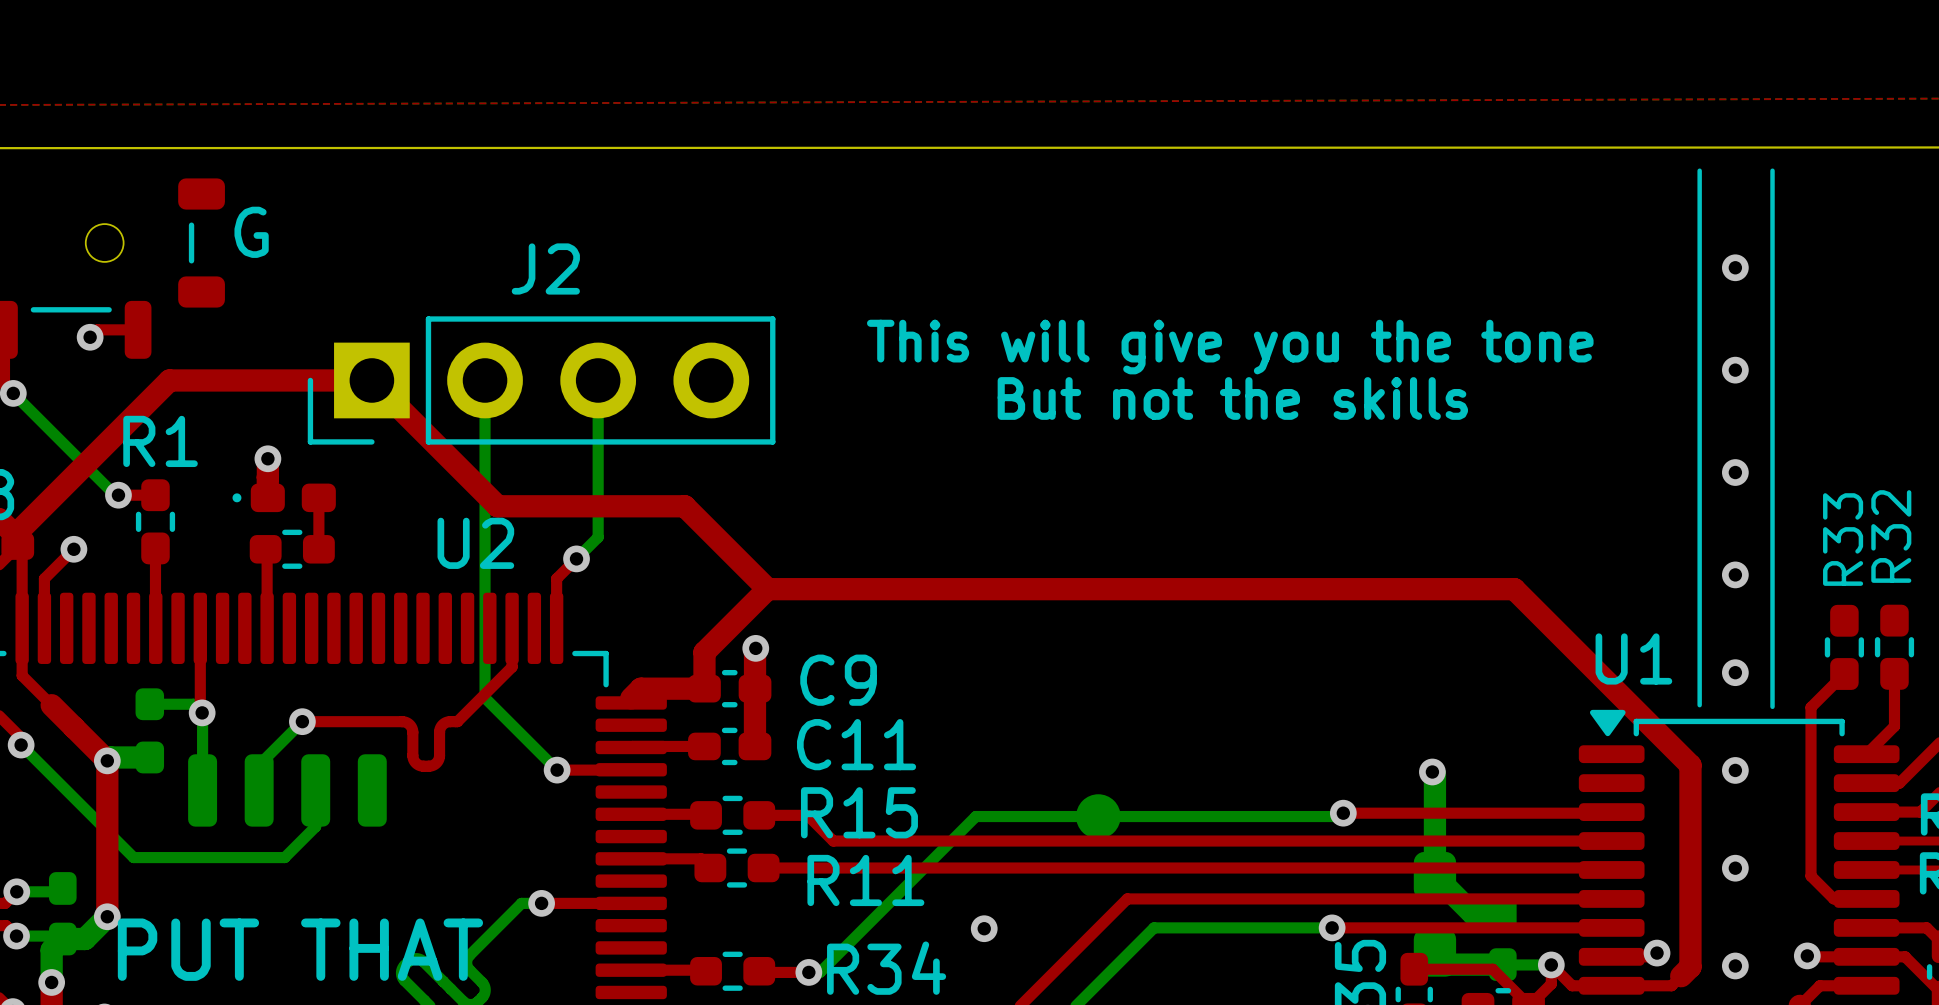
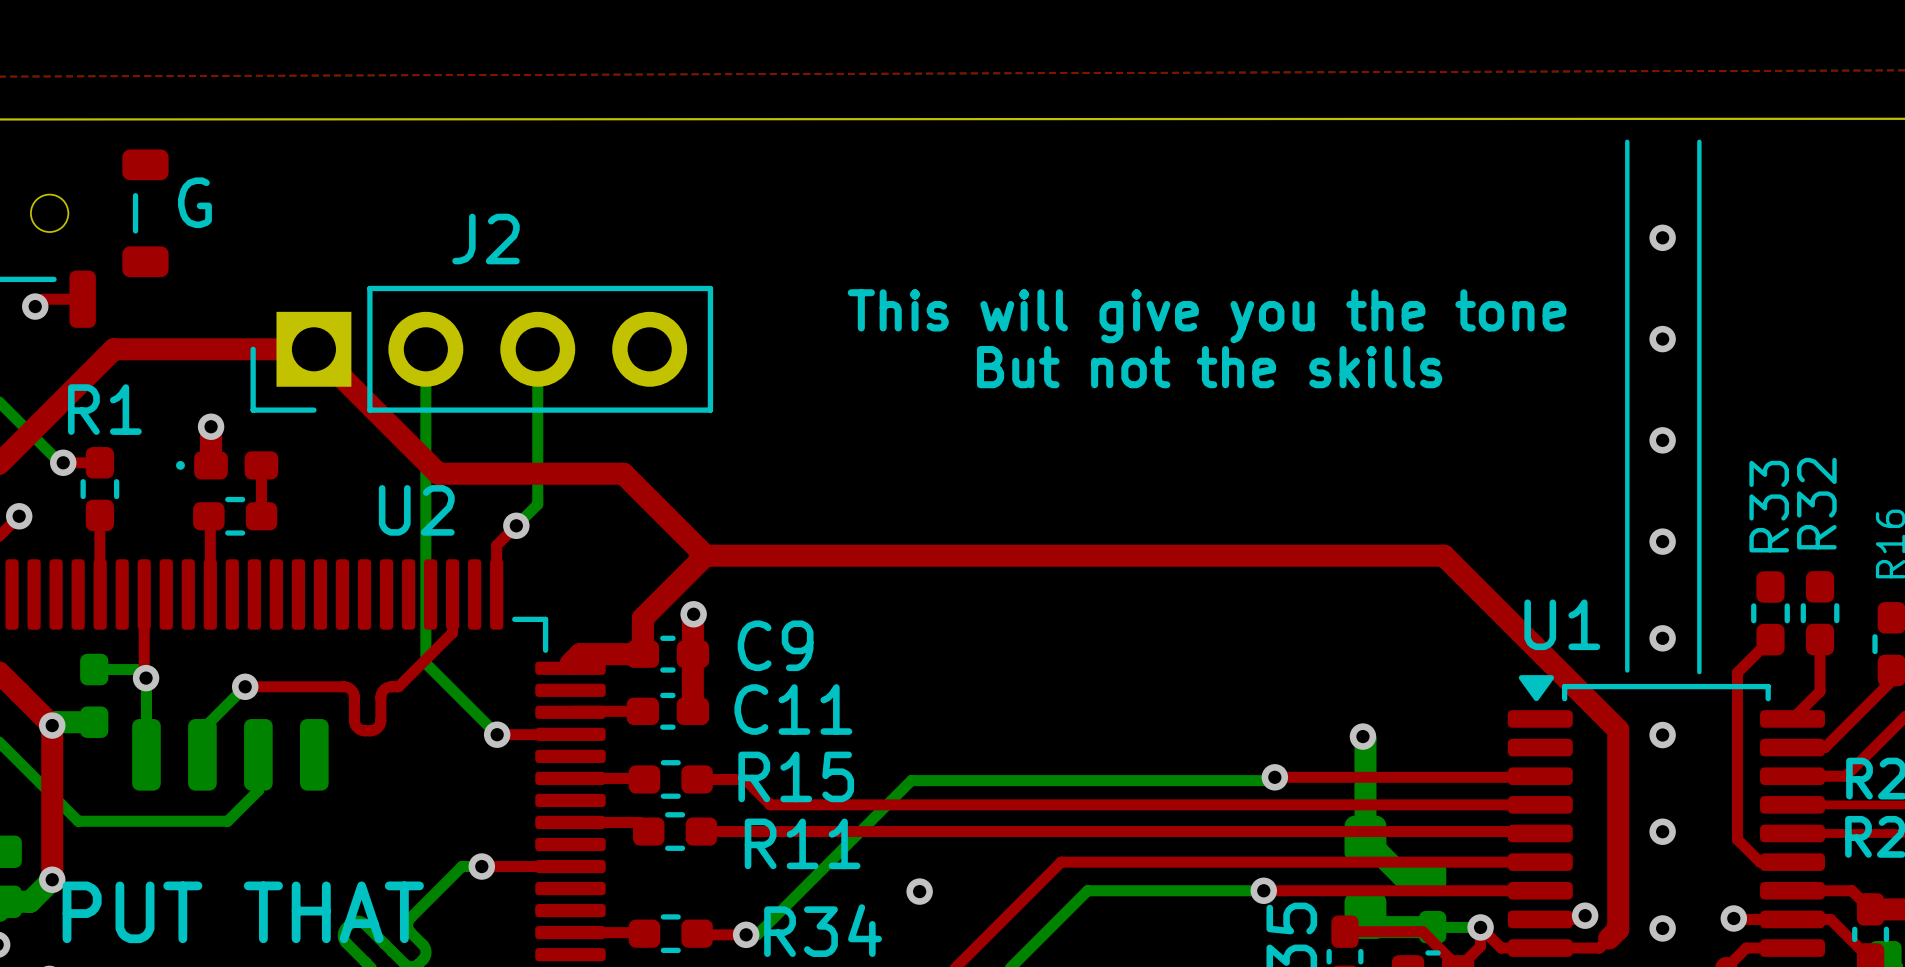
text position: This will give you the tone (1230, 347) -> This will give you the tone (1207, 316)
text position: But not the skills (1232, 398) -> But not the skills (1209, 367)
part: (1098, 816) -> none

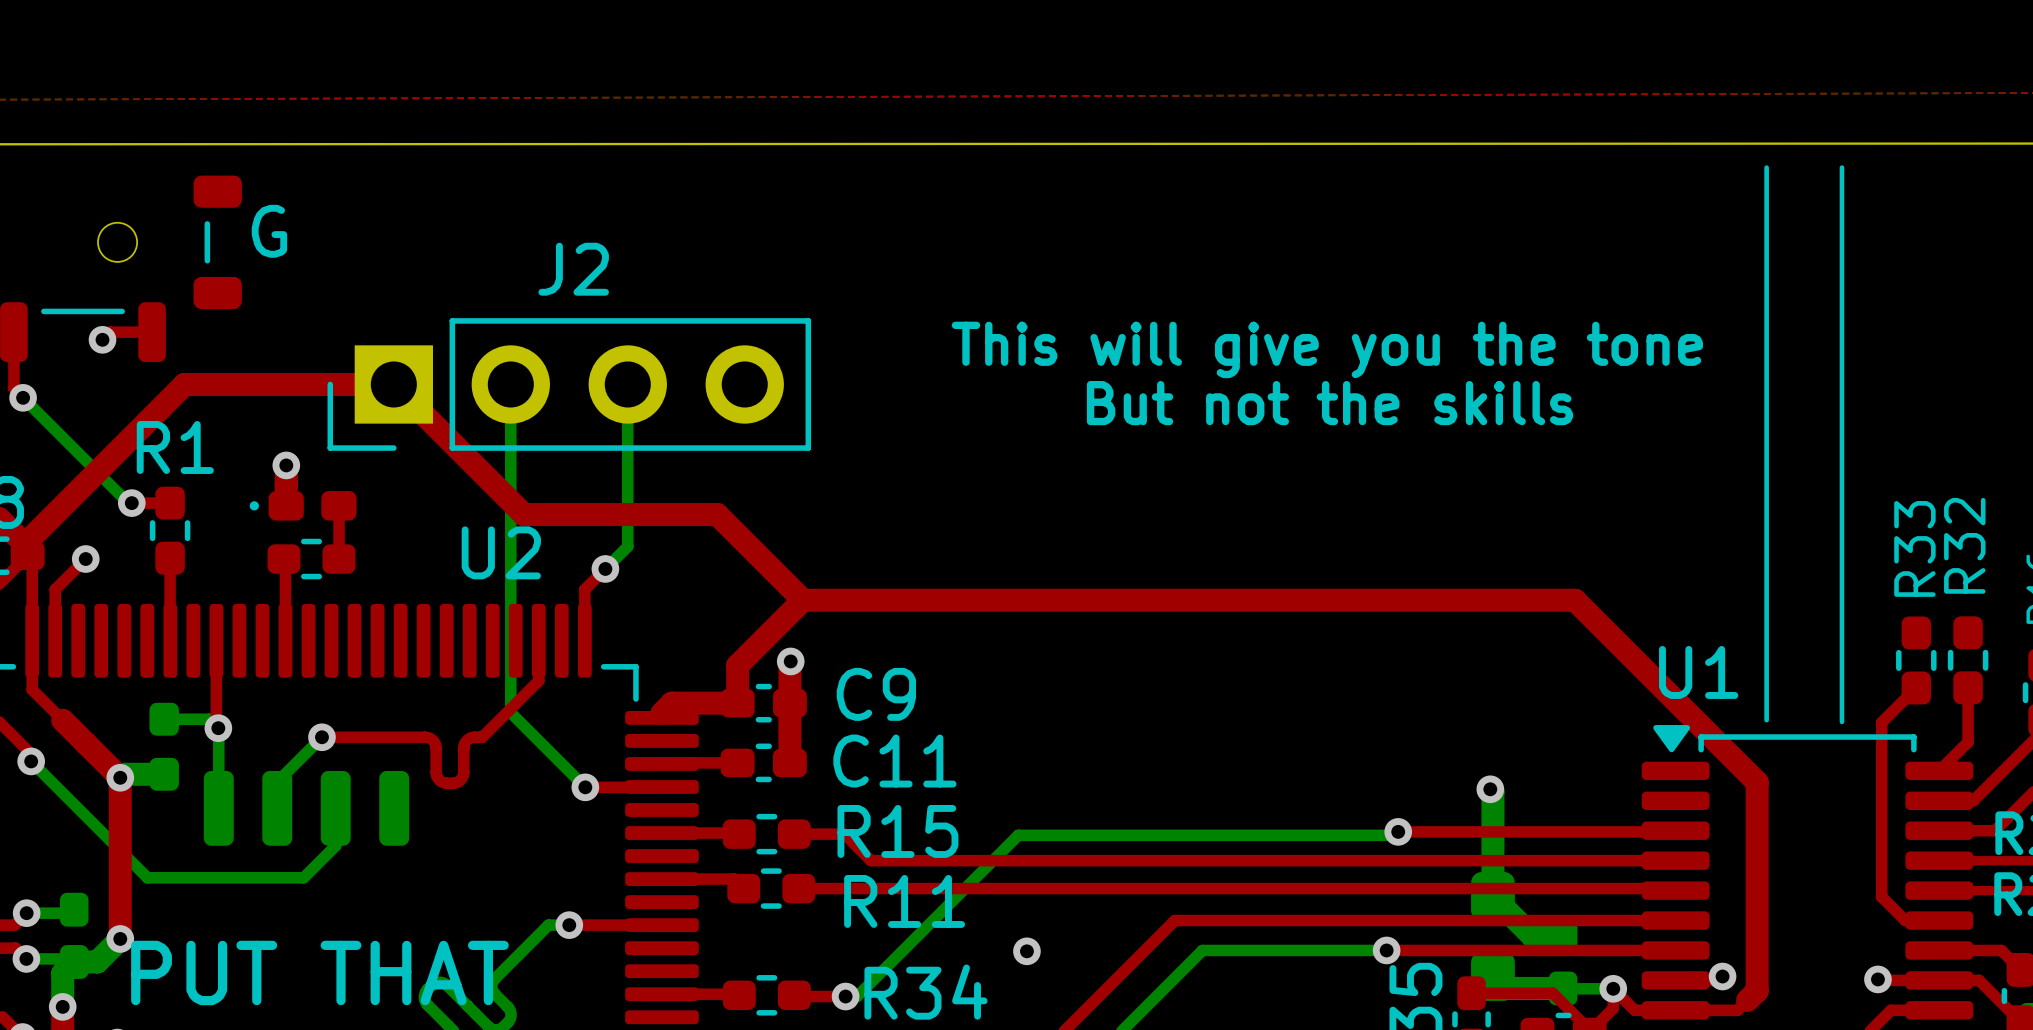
via: (1662, 237) -> none
via: (1662, 339) -> none
via: (1662, 440) -> none
via: (1662, 541) -> none
via: (1662, 638) -> none
via: (1662, 735) -> none
via: (1662, 831) -> none
via: (1662, 928) -> none

